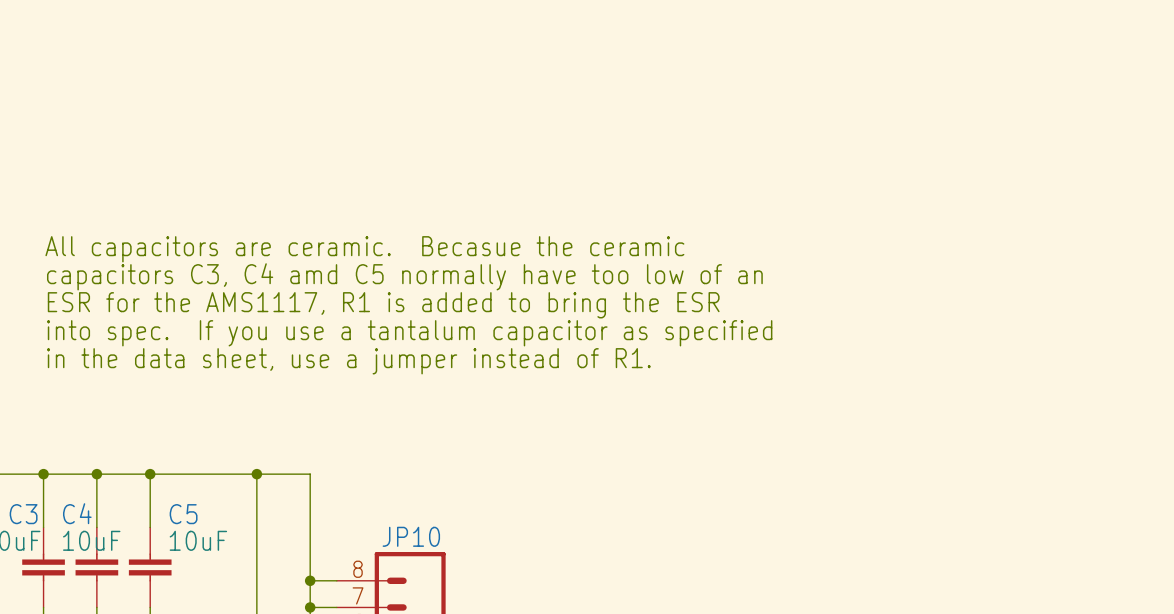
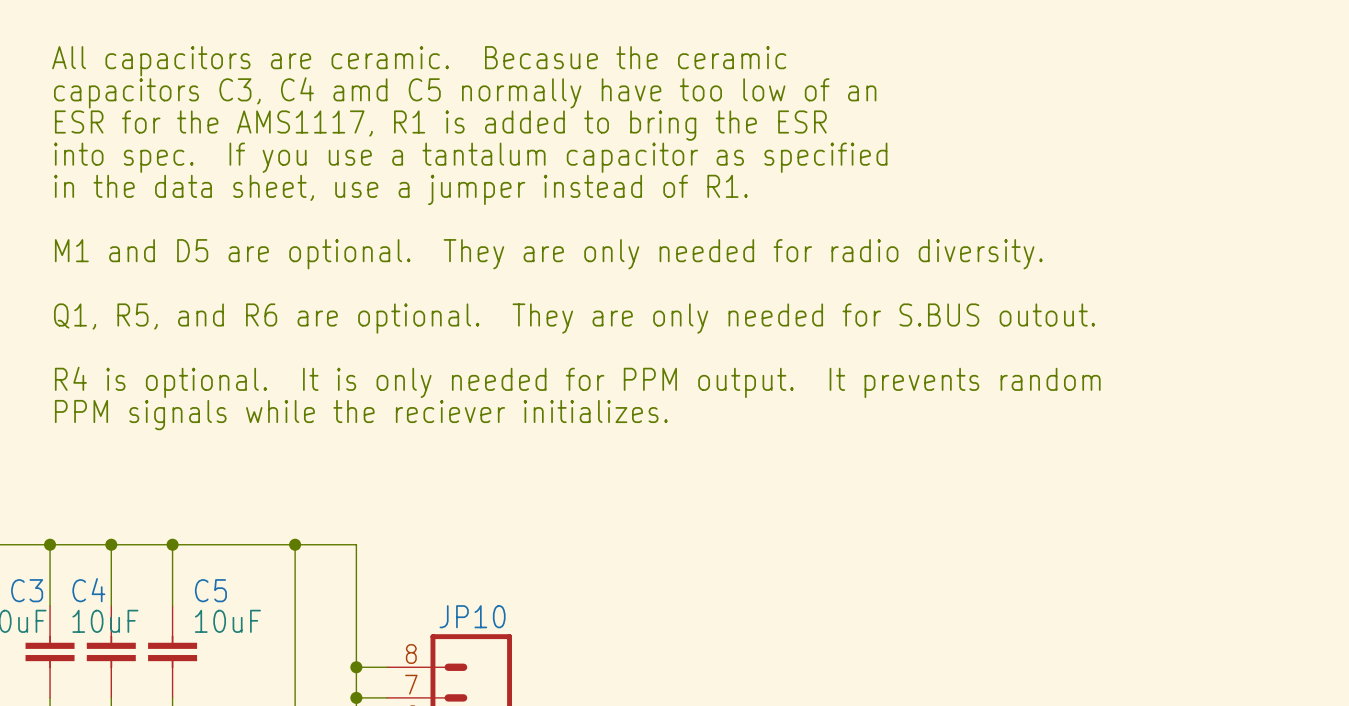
text: none -> capacitors C3, C4 amd C5 normally have too low of an (465, 92)
text: none -> into spec. If you use a tantalum capacitor as specified (470, 157)
text: none -> in the data sheet, use a jumper instead of R1. (400, 189)
text: none -> M1 and D5 are optional. They are only needed for radio diversity. (548, 254)
text position: All capacitors are ceramic. Becasue the ceramic (364, 249) -> All capacitors are ceramic. Becasue the ceramic (419, 61)
text: capacitors C3, C4 amd C5 normally have too low of an (404, 276) -> Q1, R5, and R6 are optional. They are only needed for S.BUS outout. (574, 318)
text position: ESR for the AMS1117, R1 is added to bring the ESR (383, 305) -> ESR for the AMS1117, R1 is added to bring the ESR (440, 125)
text: into spec. If you use a tantalum capacitor as specified (409, 333) -> R4 is optional. It is only needed for PPM output. It prevents random (577, 382)
text: in the data sheet, use a jumper instead of R1. (348, 361) -> PPM signals while the reciever initializes. (361, 415)

